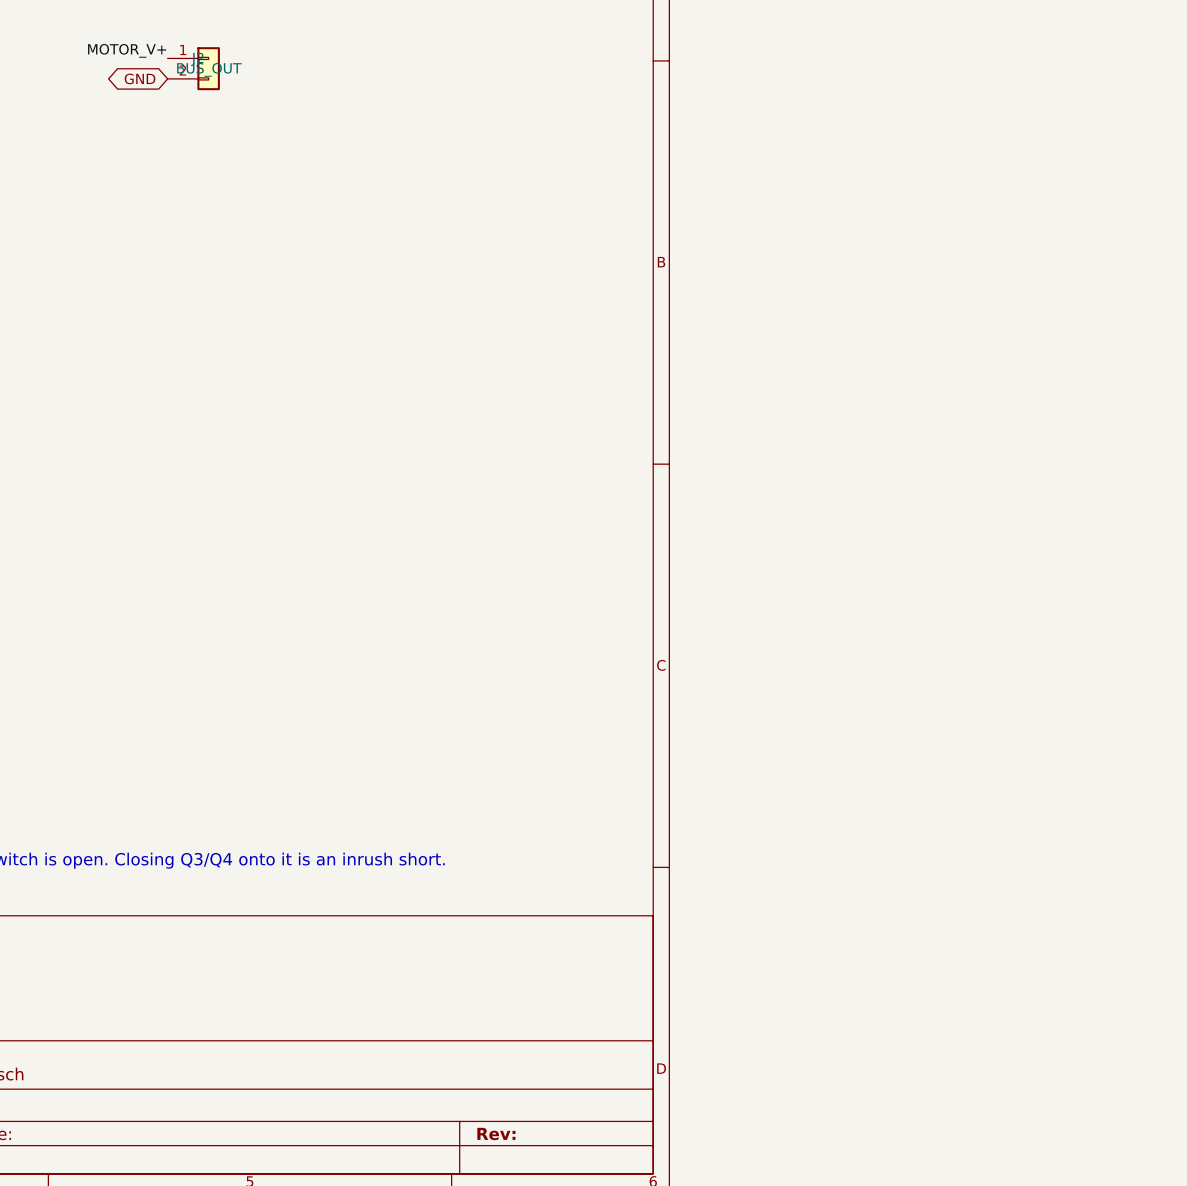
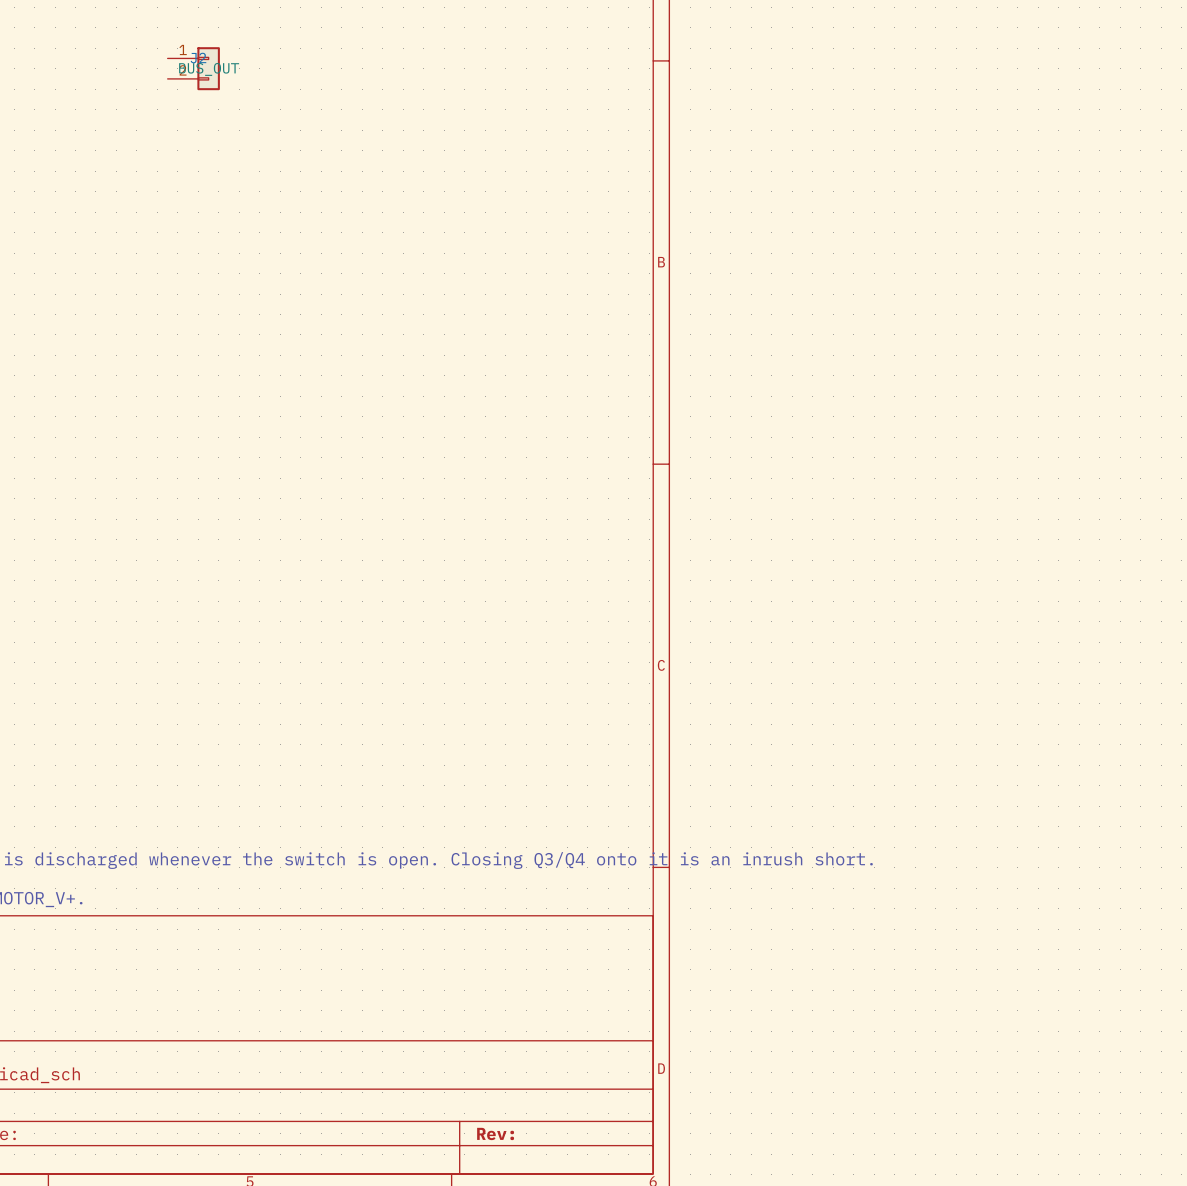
label: MOTOR_V+ (127, 50) -> none
global label: GND (140, 78) -> none

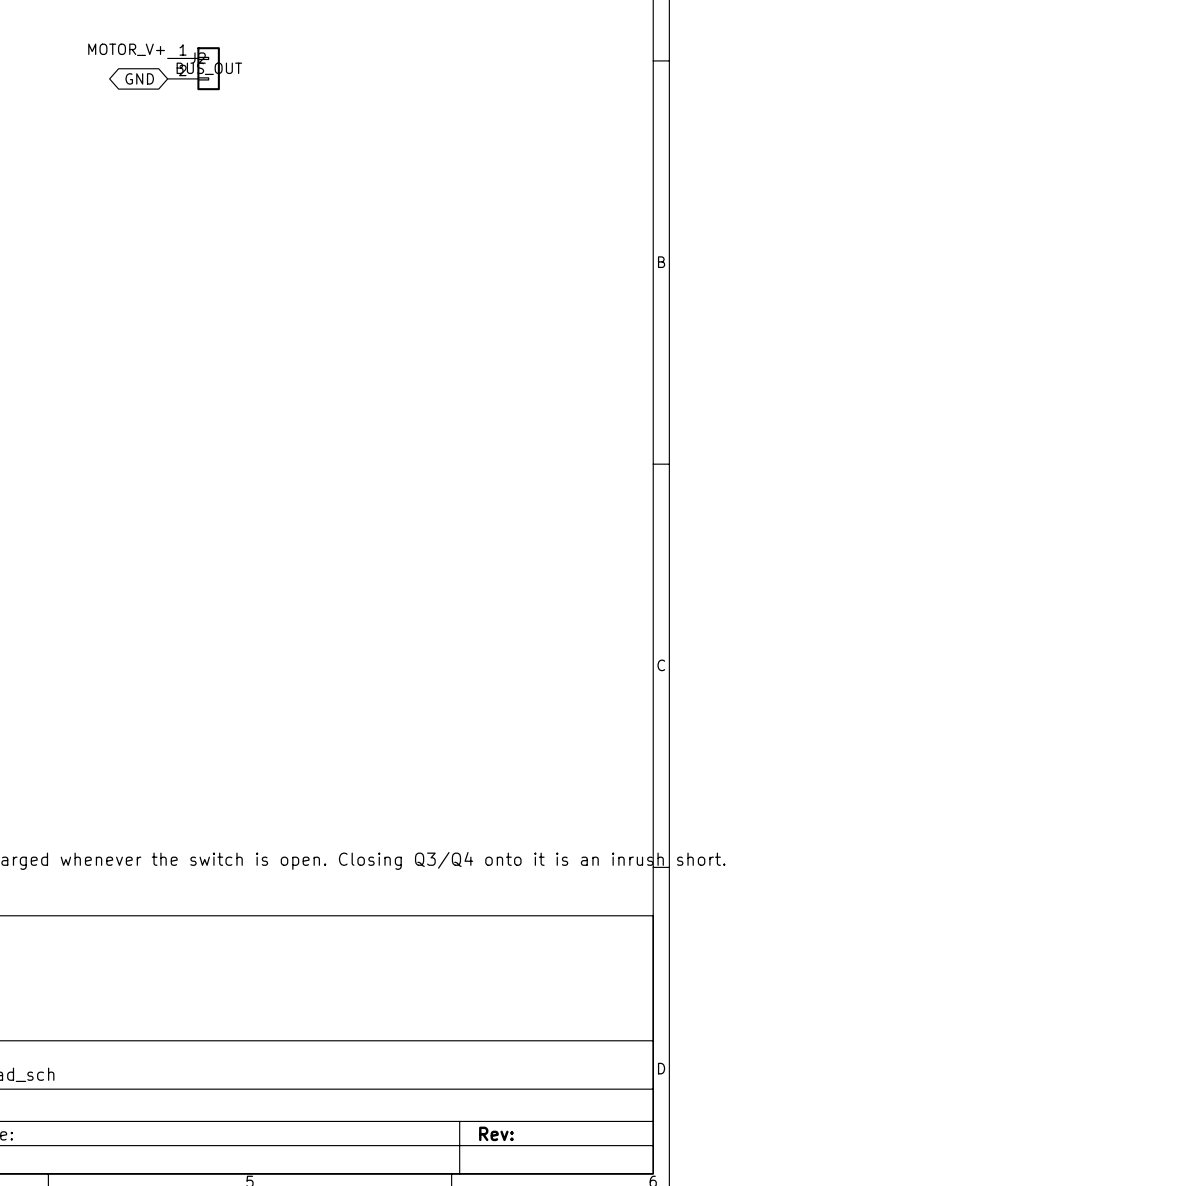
label: none -> MOTOR_V+ (126, 49)
global label: none -> GND (139, 78)

